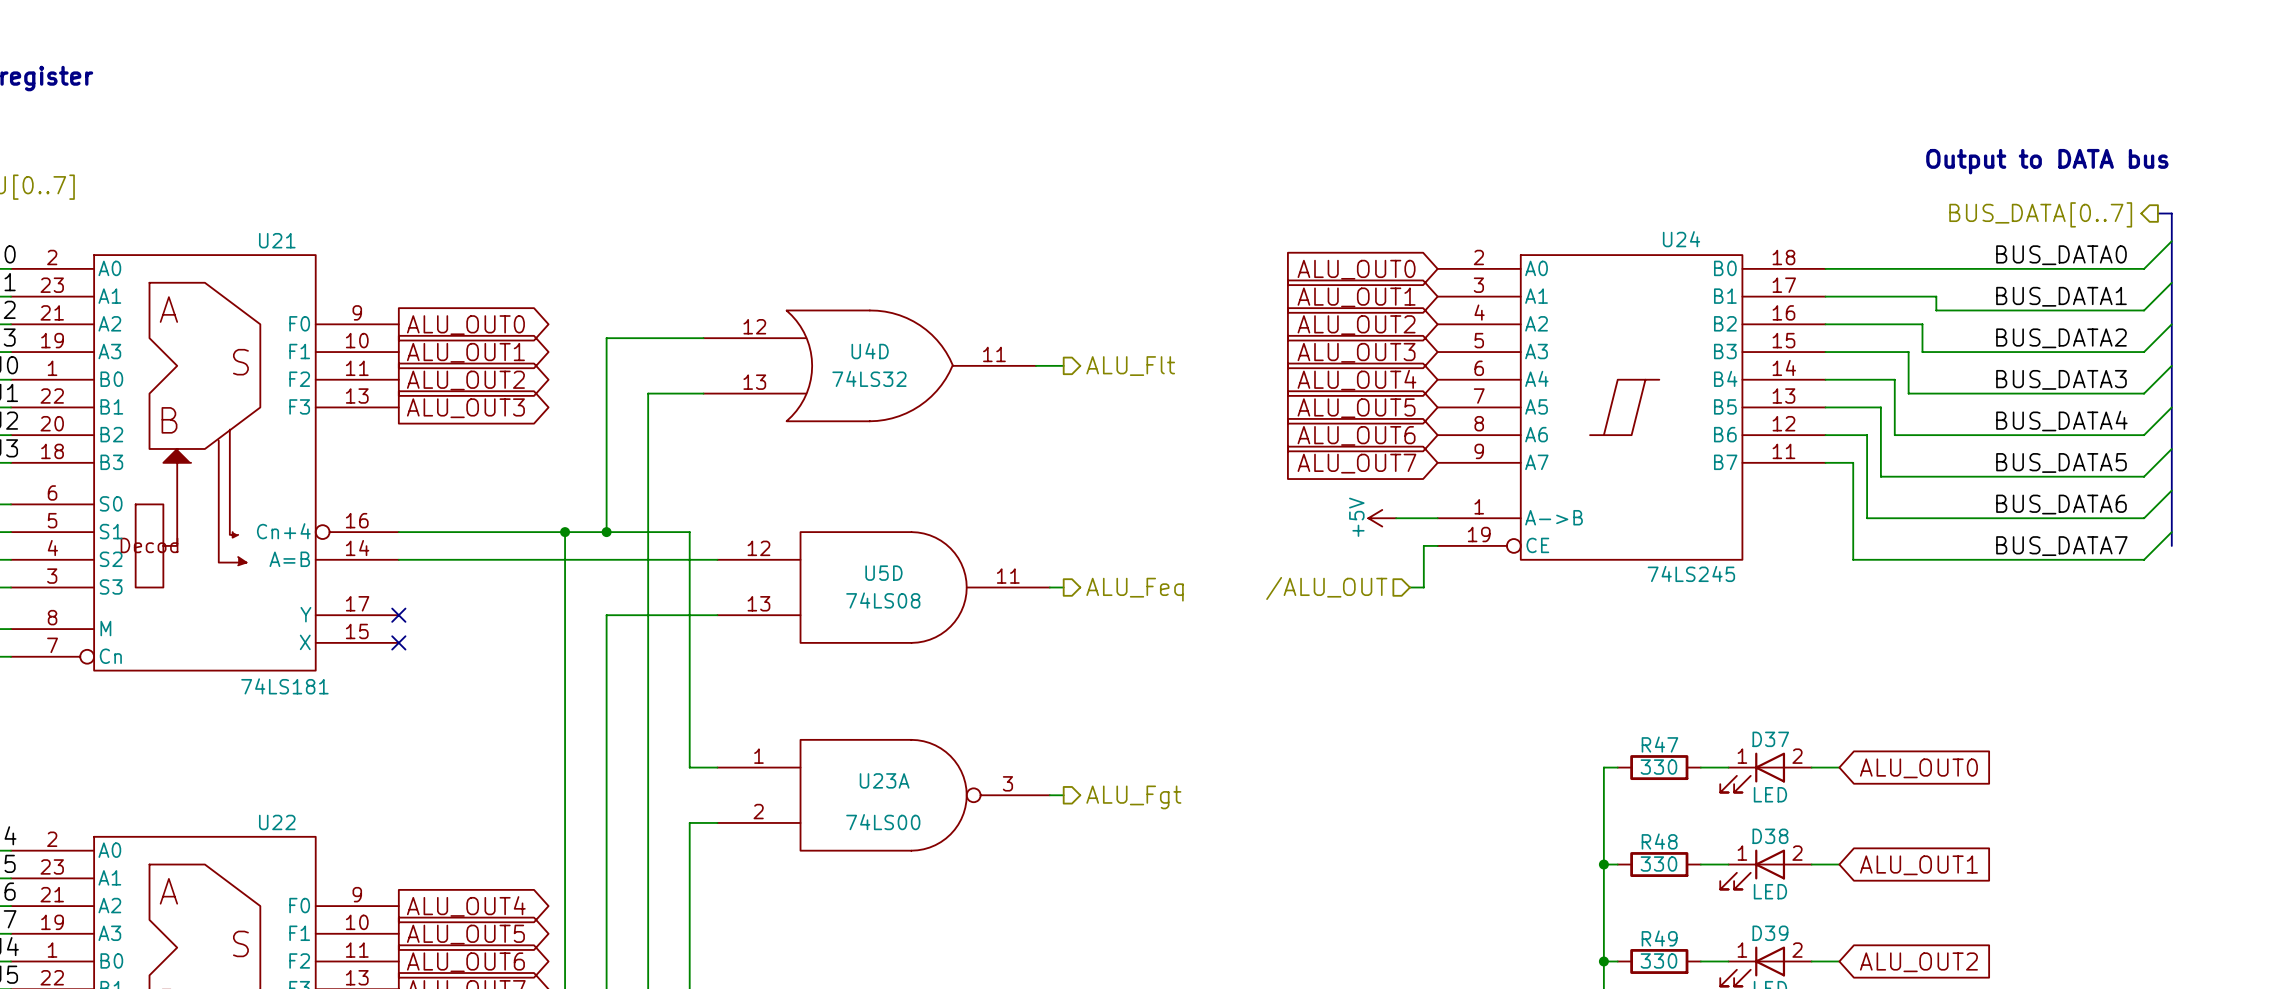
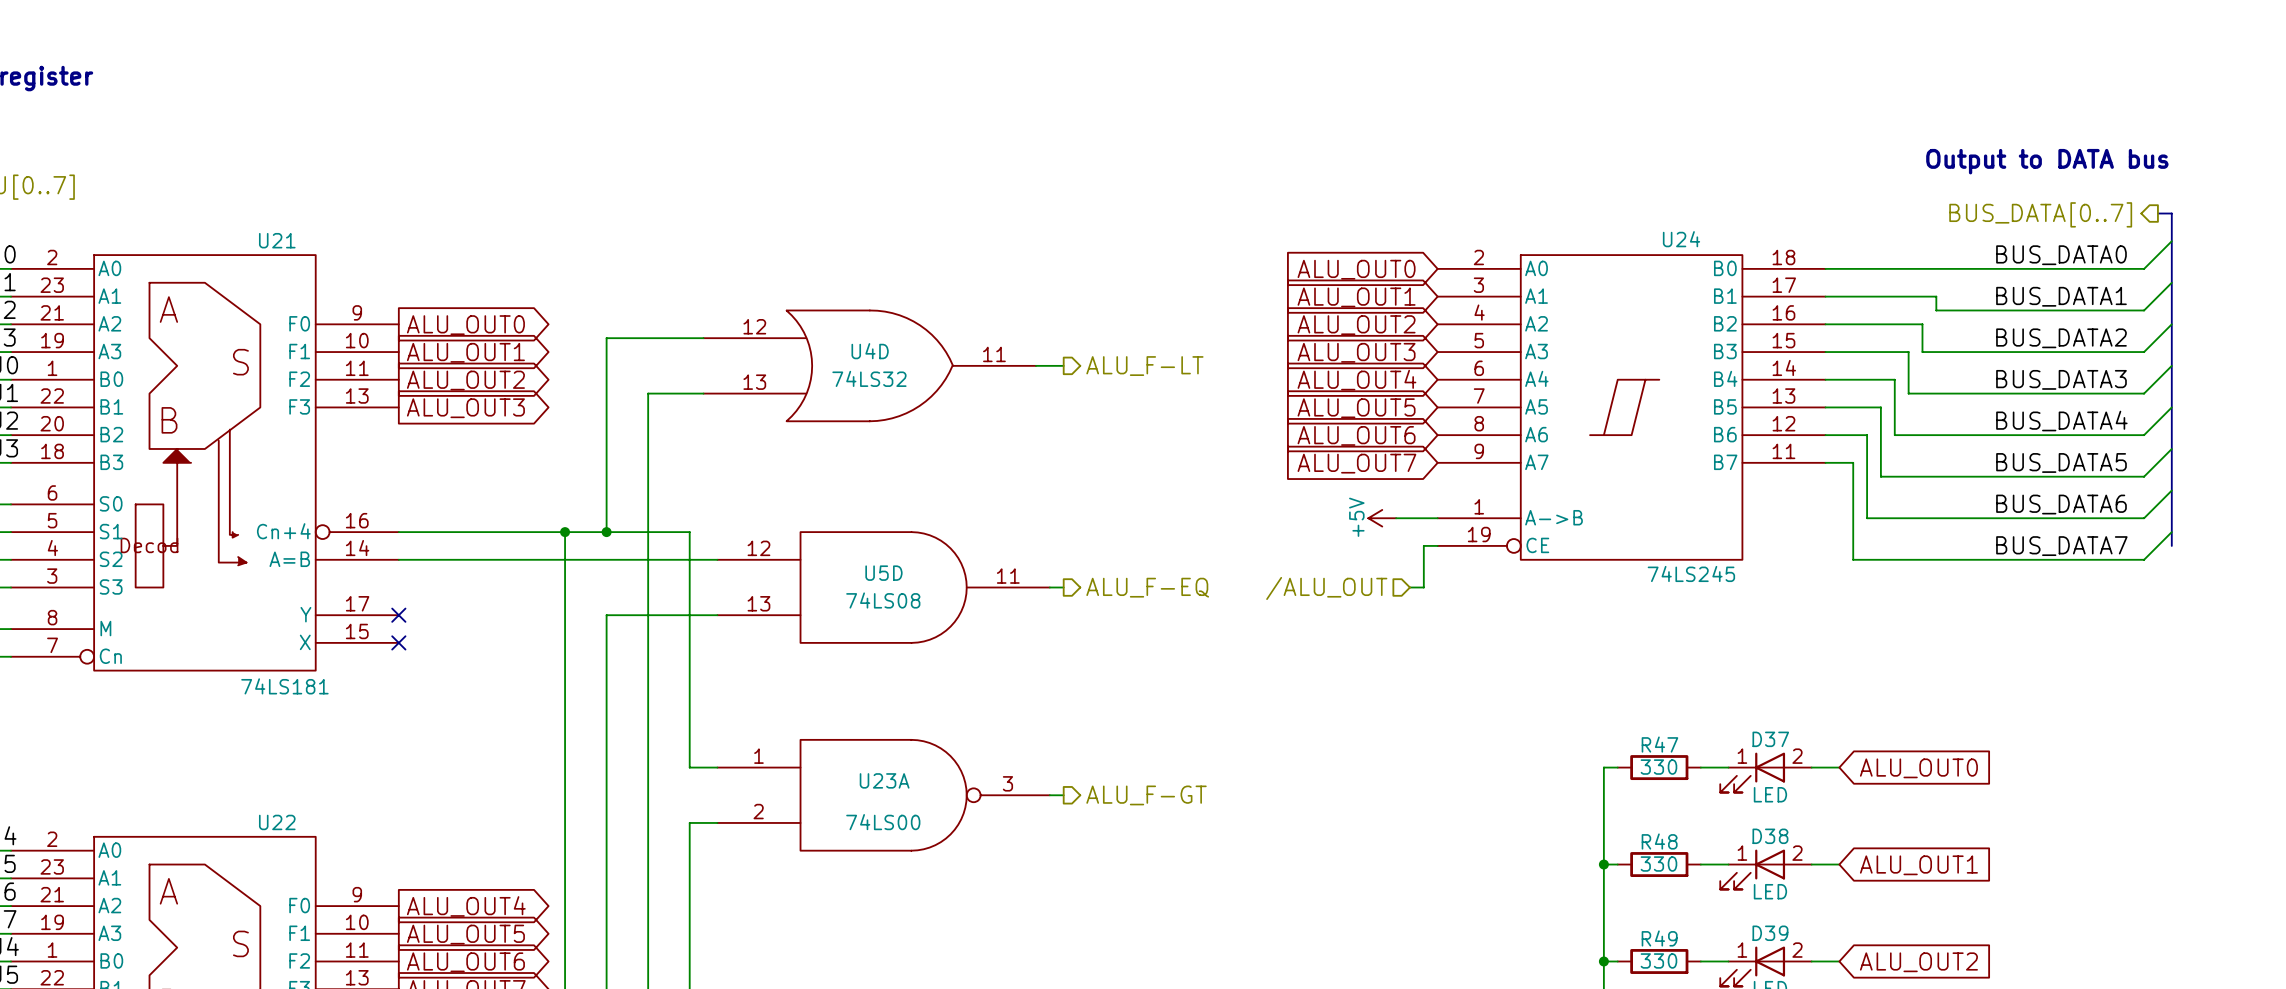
hierarchical label: ALU_Flt (1130, 366) -> ALU_F-LT (1144, 366)
hierarchical label: ALU_Feq (1135, 589) -> ALU_F-EQ (1147, 587)
hierarchical label: ALU_Fgt (1133, 797) -> ALU_F-GT (1146, 795)

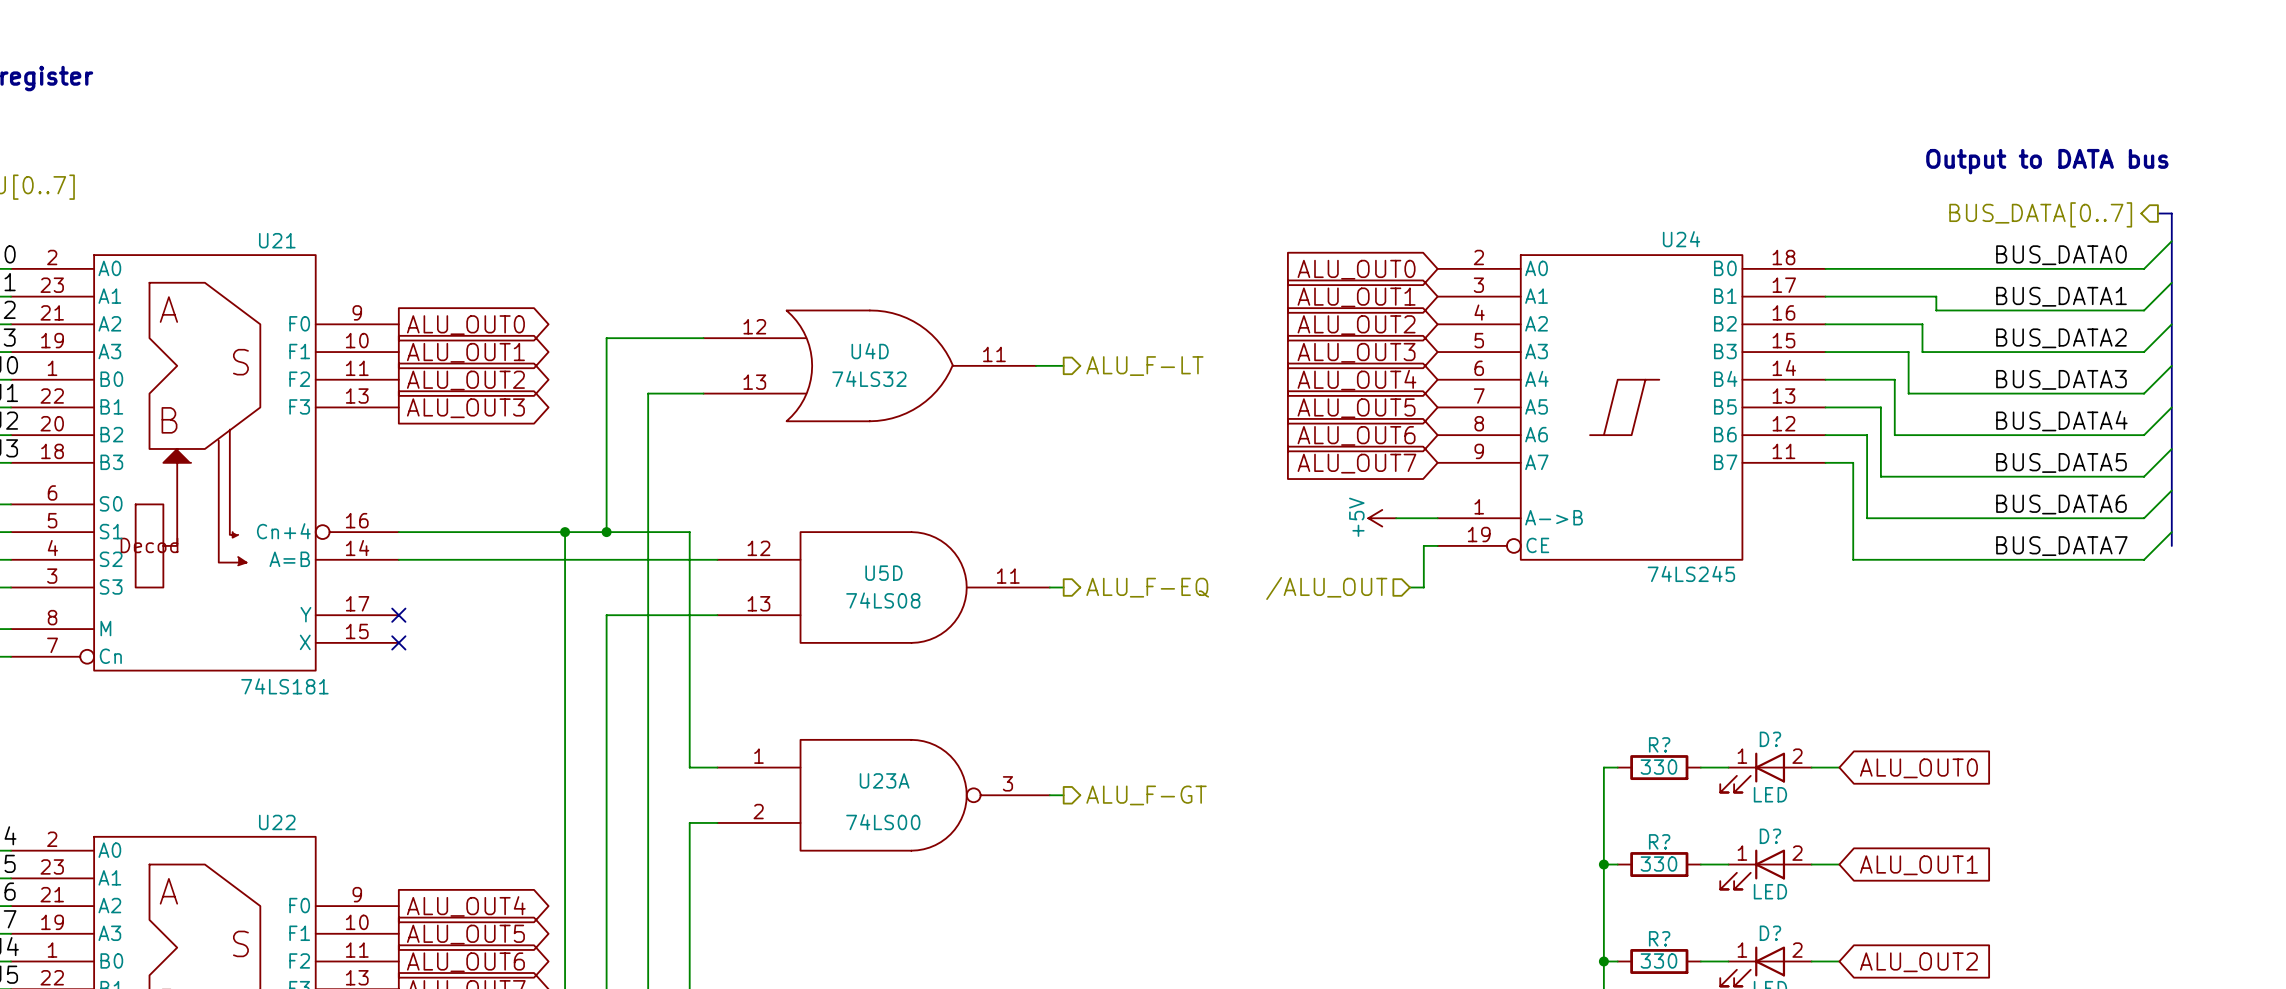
D37 name: D37 (1770, 739) -> D? (1770, 739)
R47 name: R47 (1659, 744) -> R? (1659, 744)
D38 name: D38 (1770, 836) -> D? (1770, 836)
R48 name: R48 (1659, 841) -> R? (1659, 841)
D39 name: D39 (1770, 933) -> D? (1770, 933)
R49 name: R49 (1659, 938) -> R? (1659, 938)

